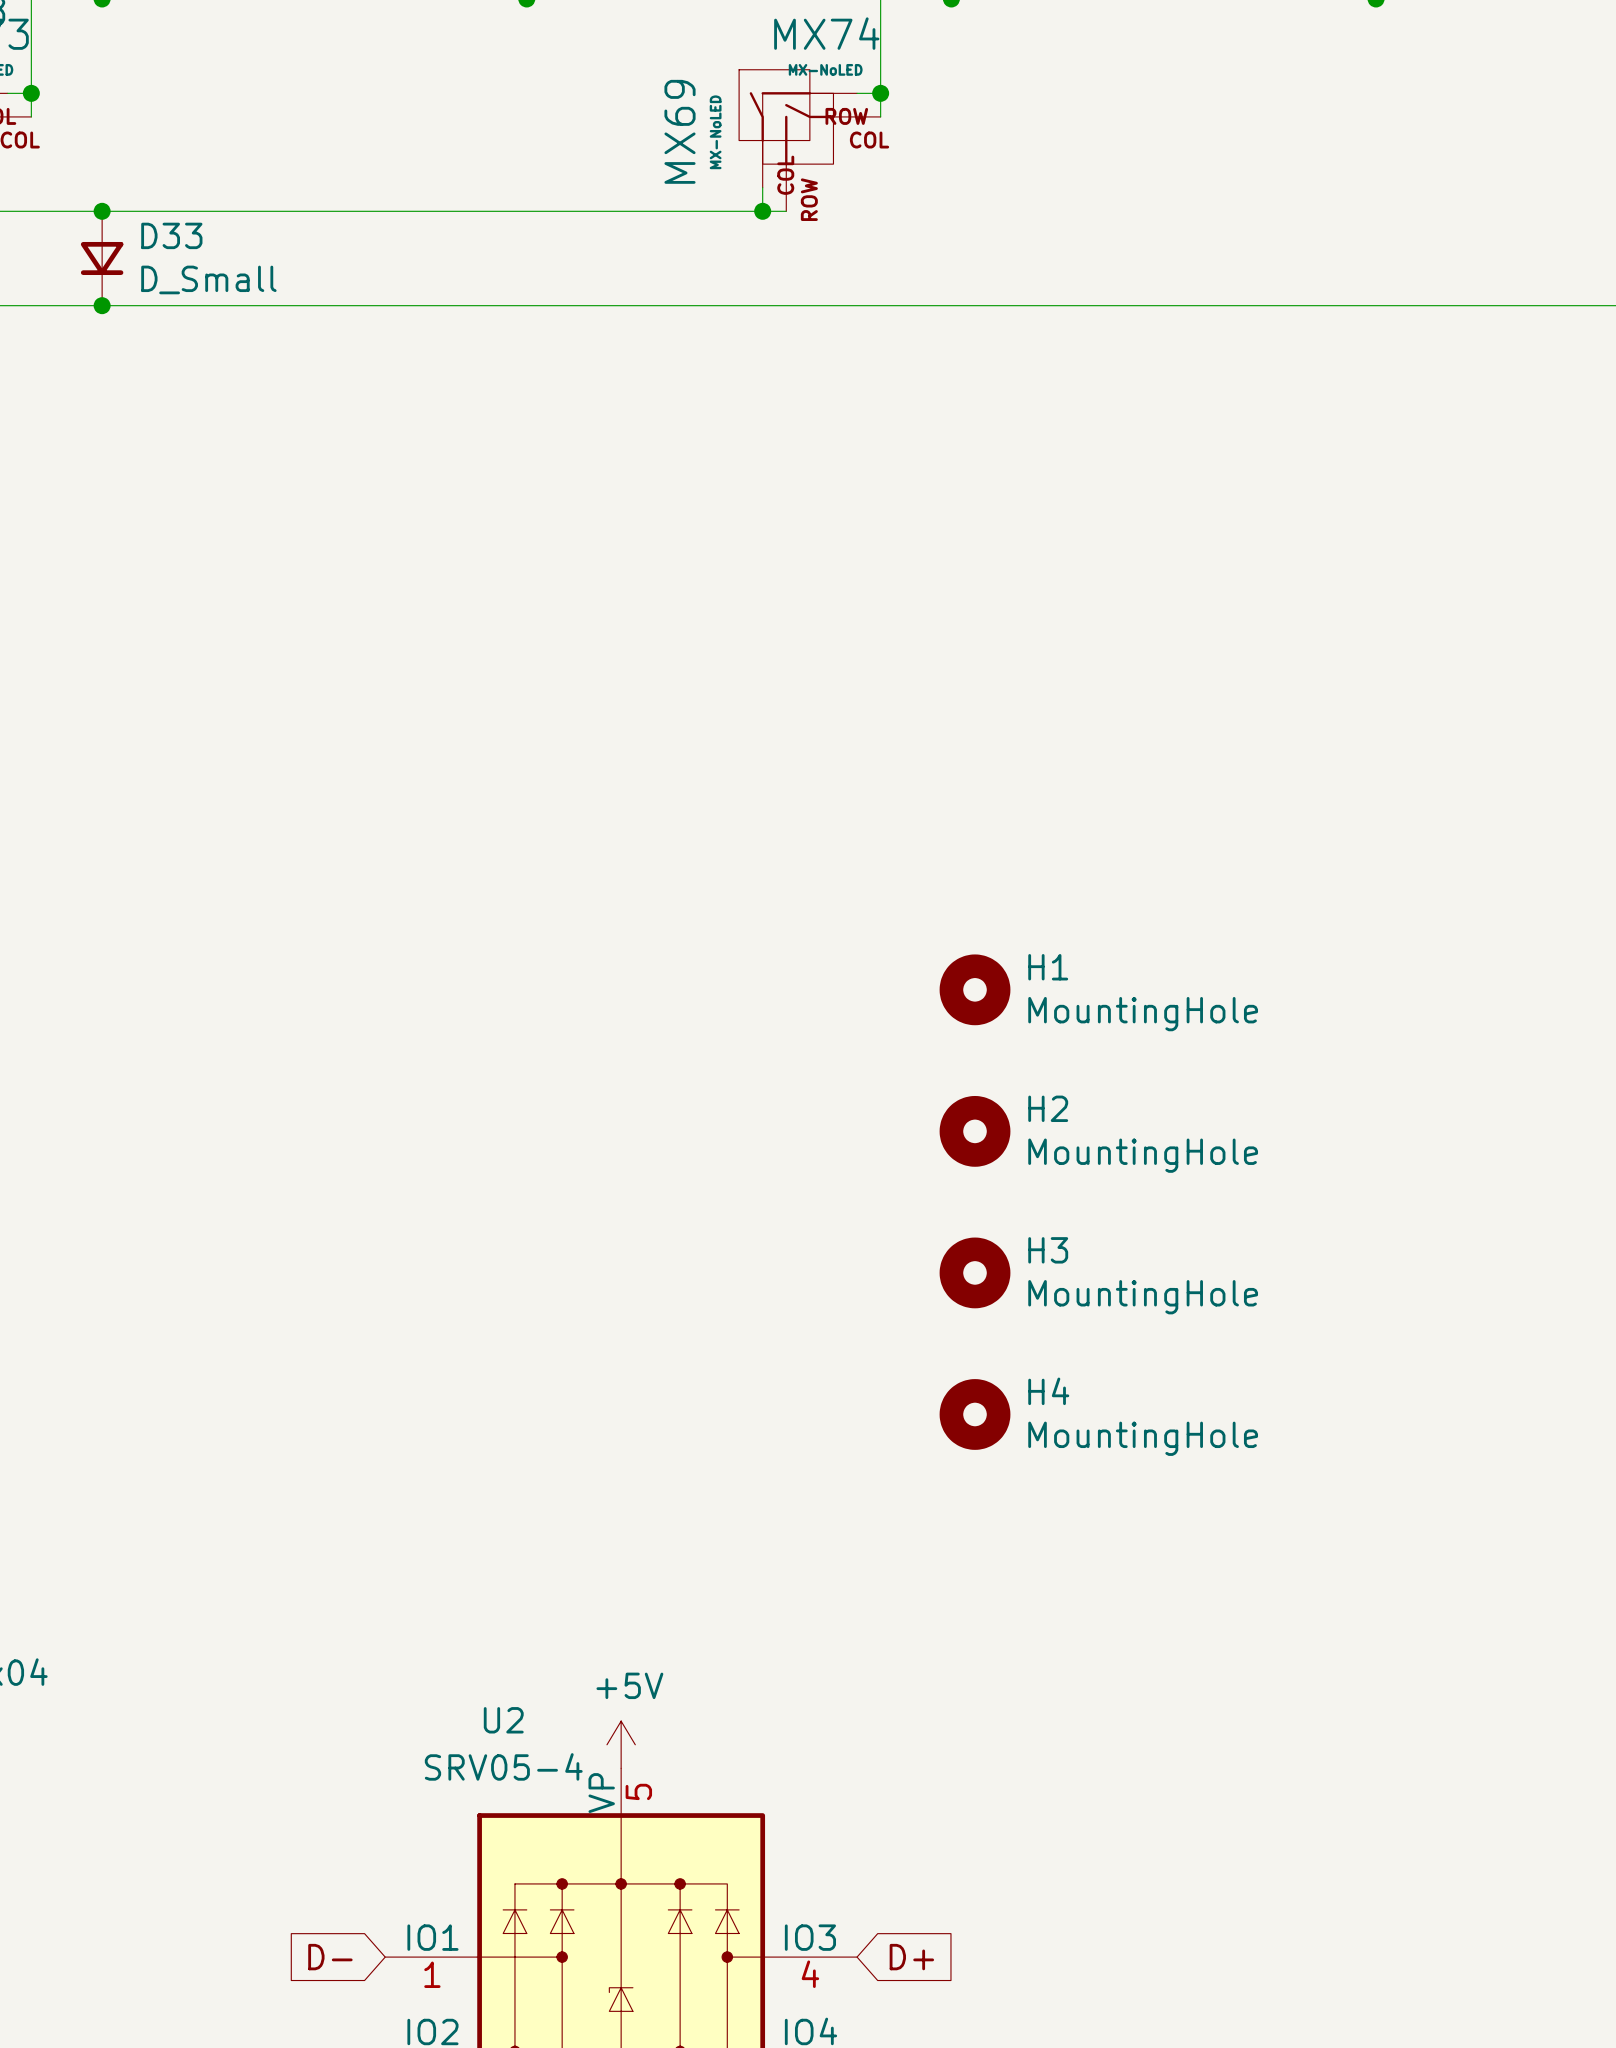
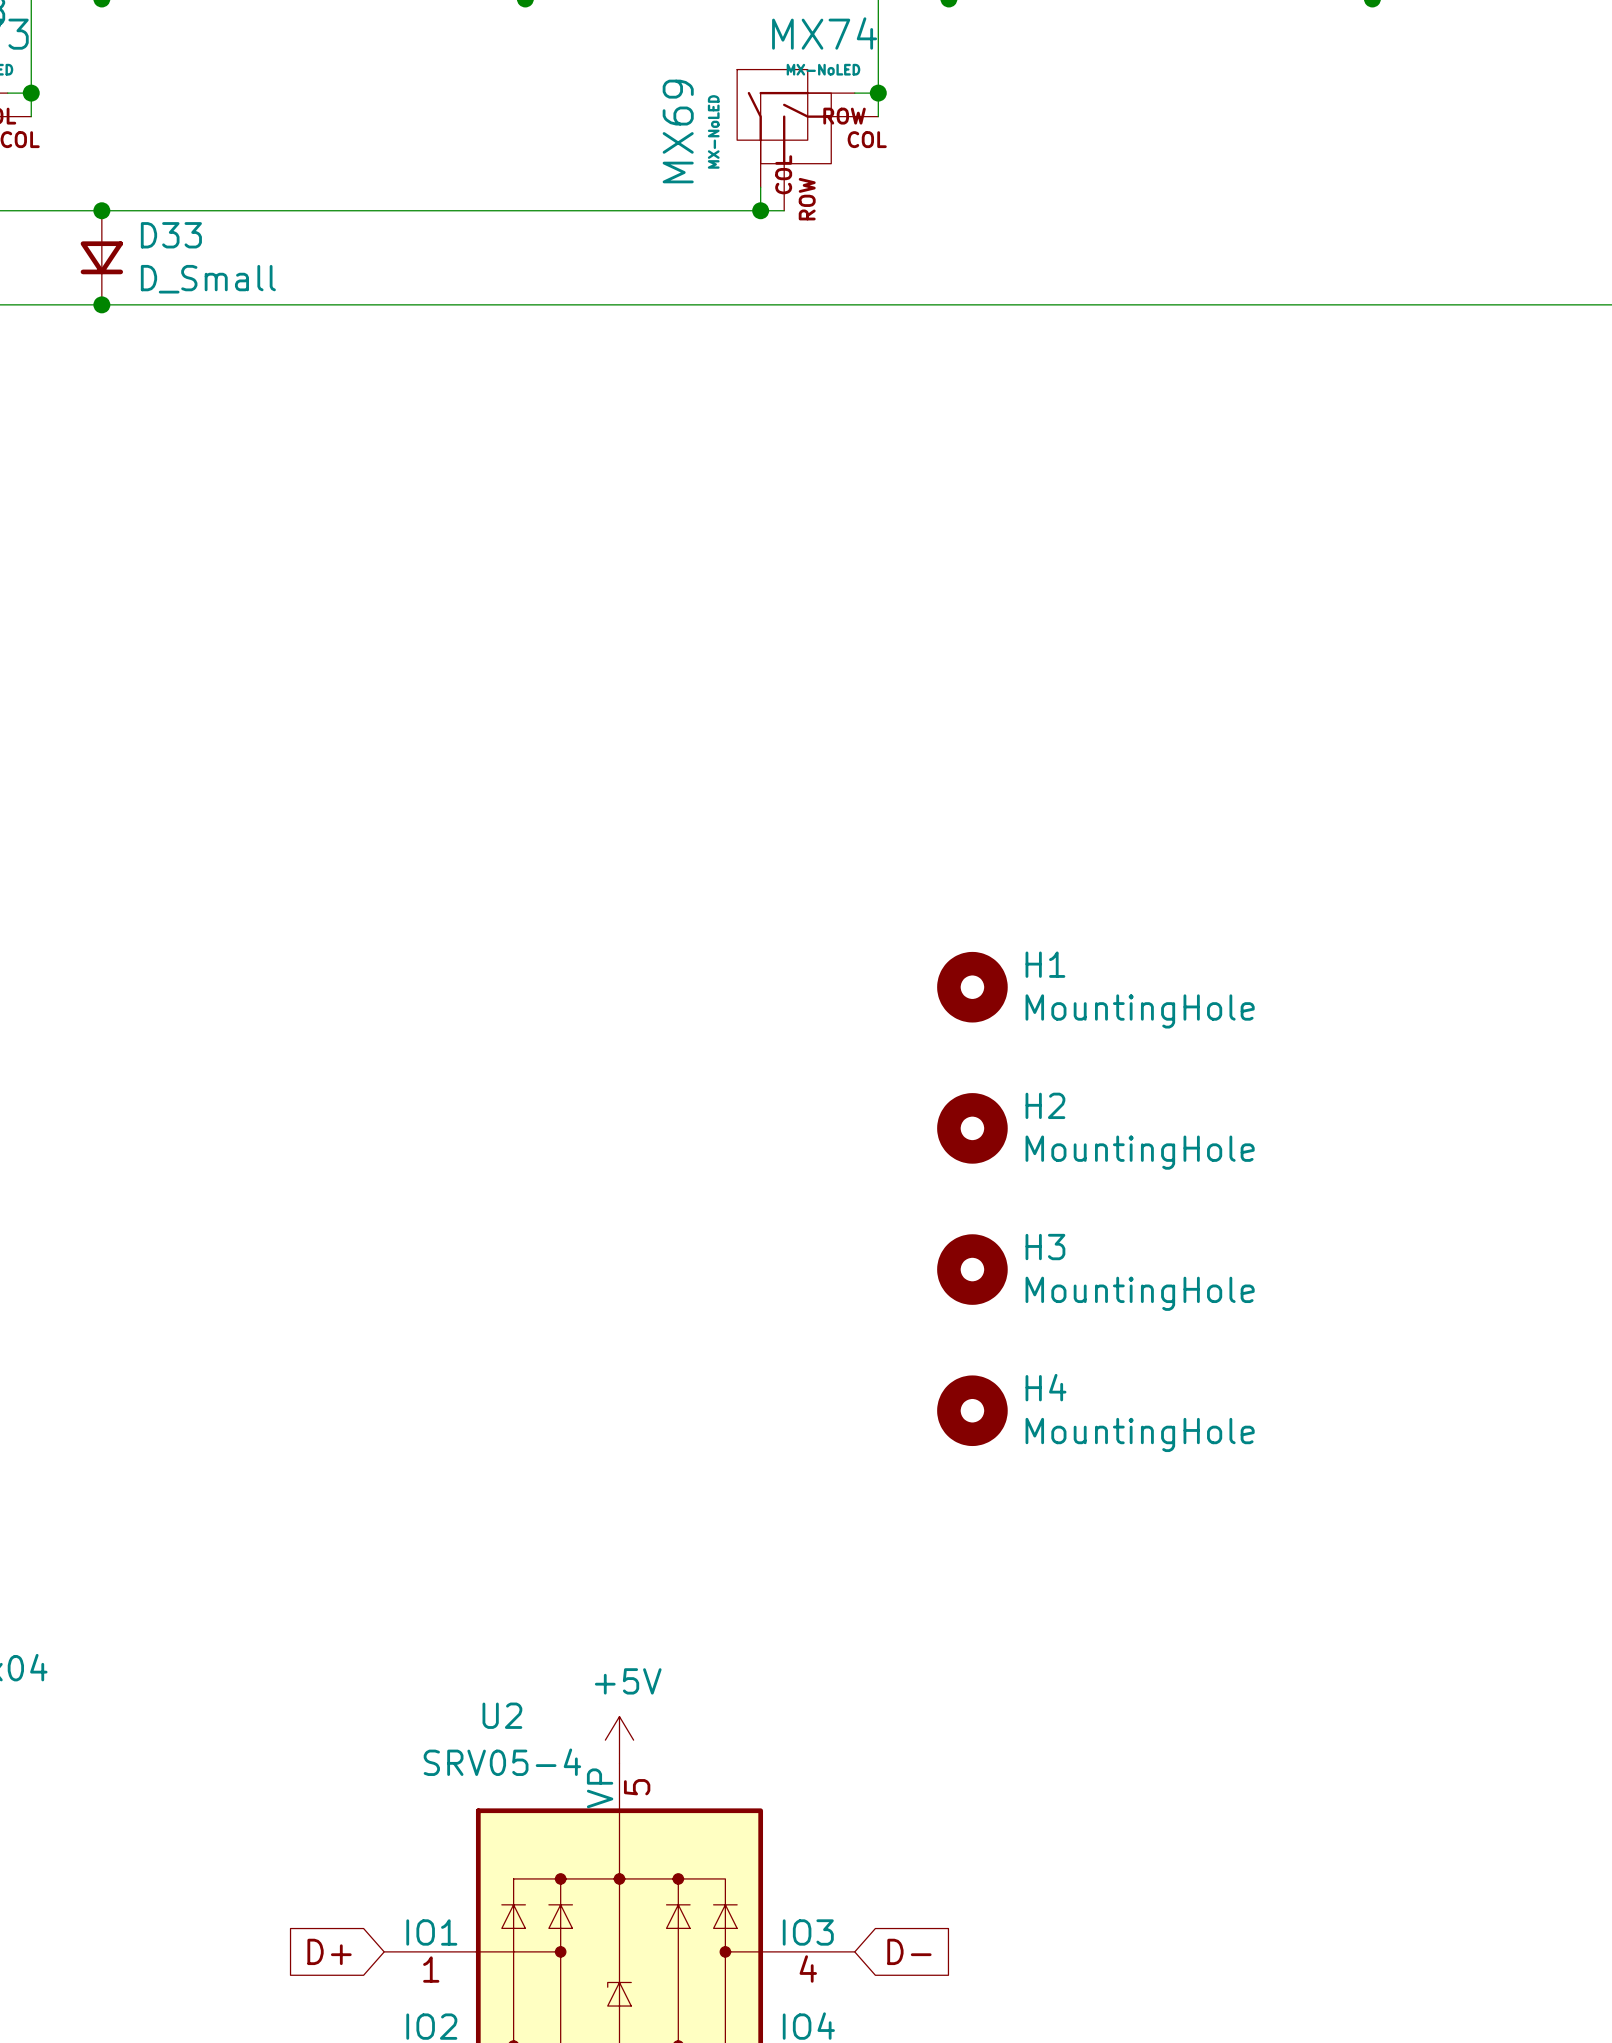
global label: D- (330, 1957) -> D+ (329, 1951)
global label: D+ (911, 1957) -> D- (909, 1951)

